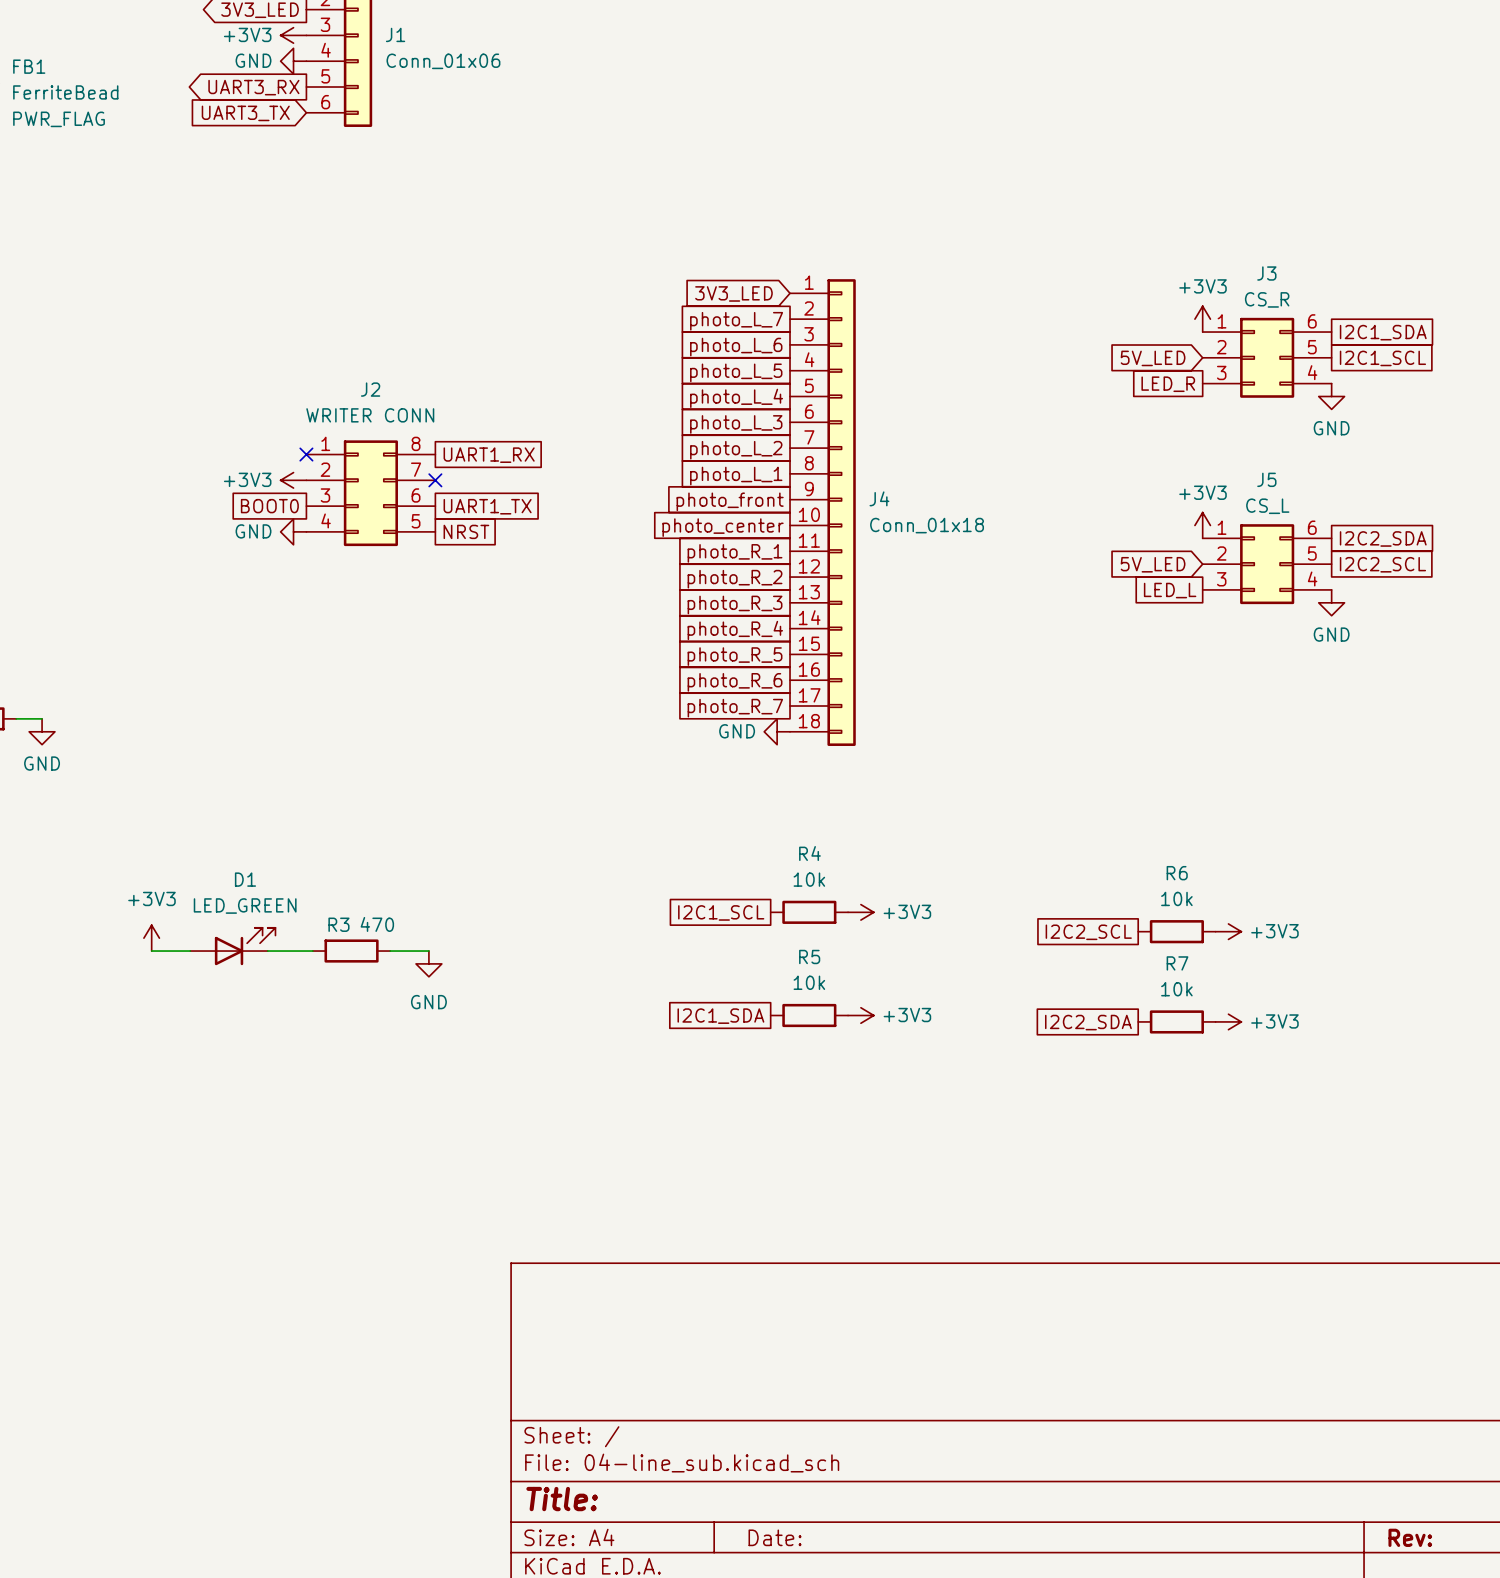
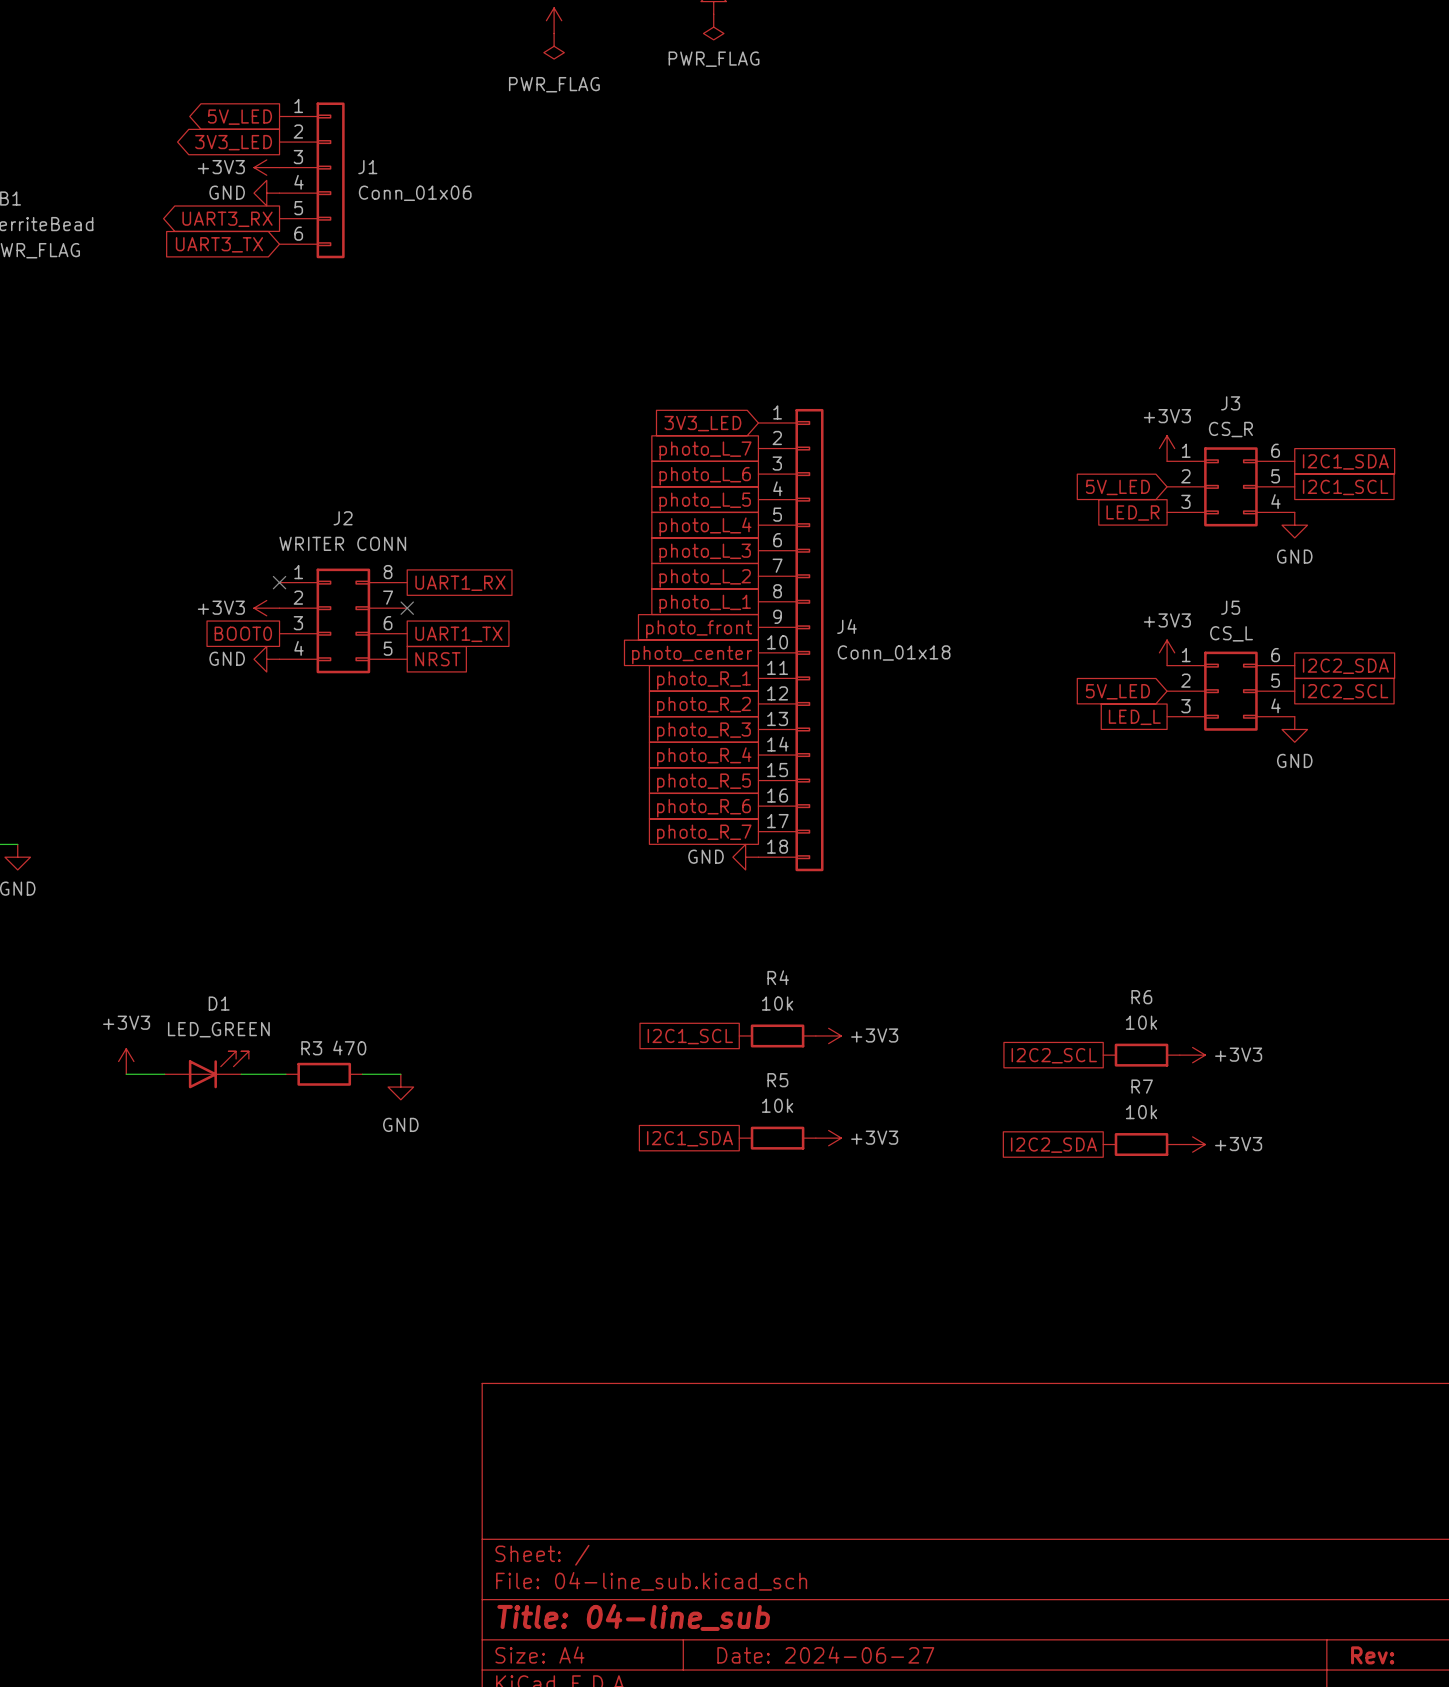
title block: Title: (562, 1499) -> Title: 04-line_sub (633, 1617)
title block: Date: (775, 1537) -> Date: 2024-06-27 (825, 1655)

